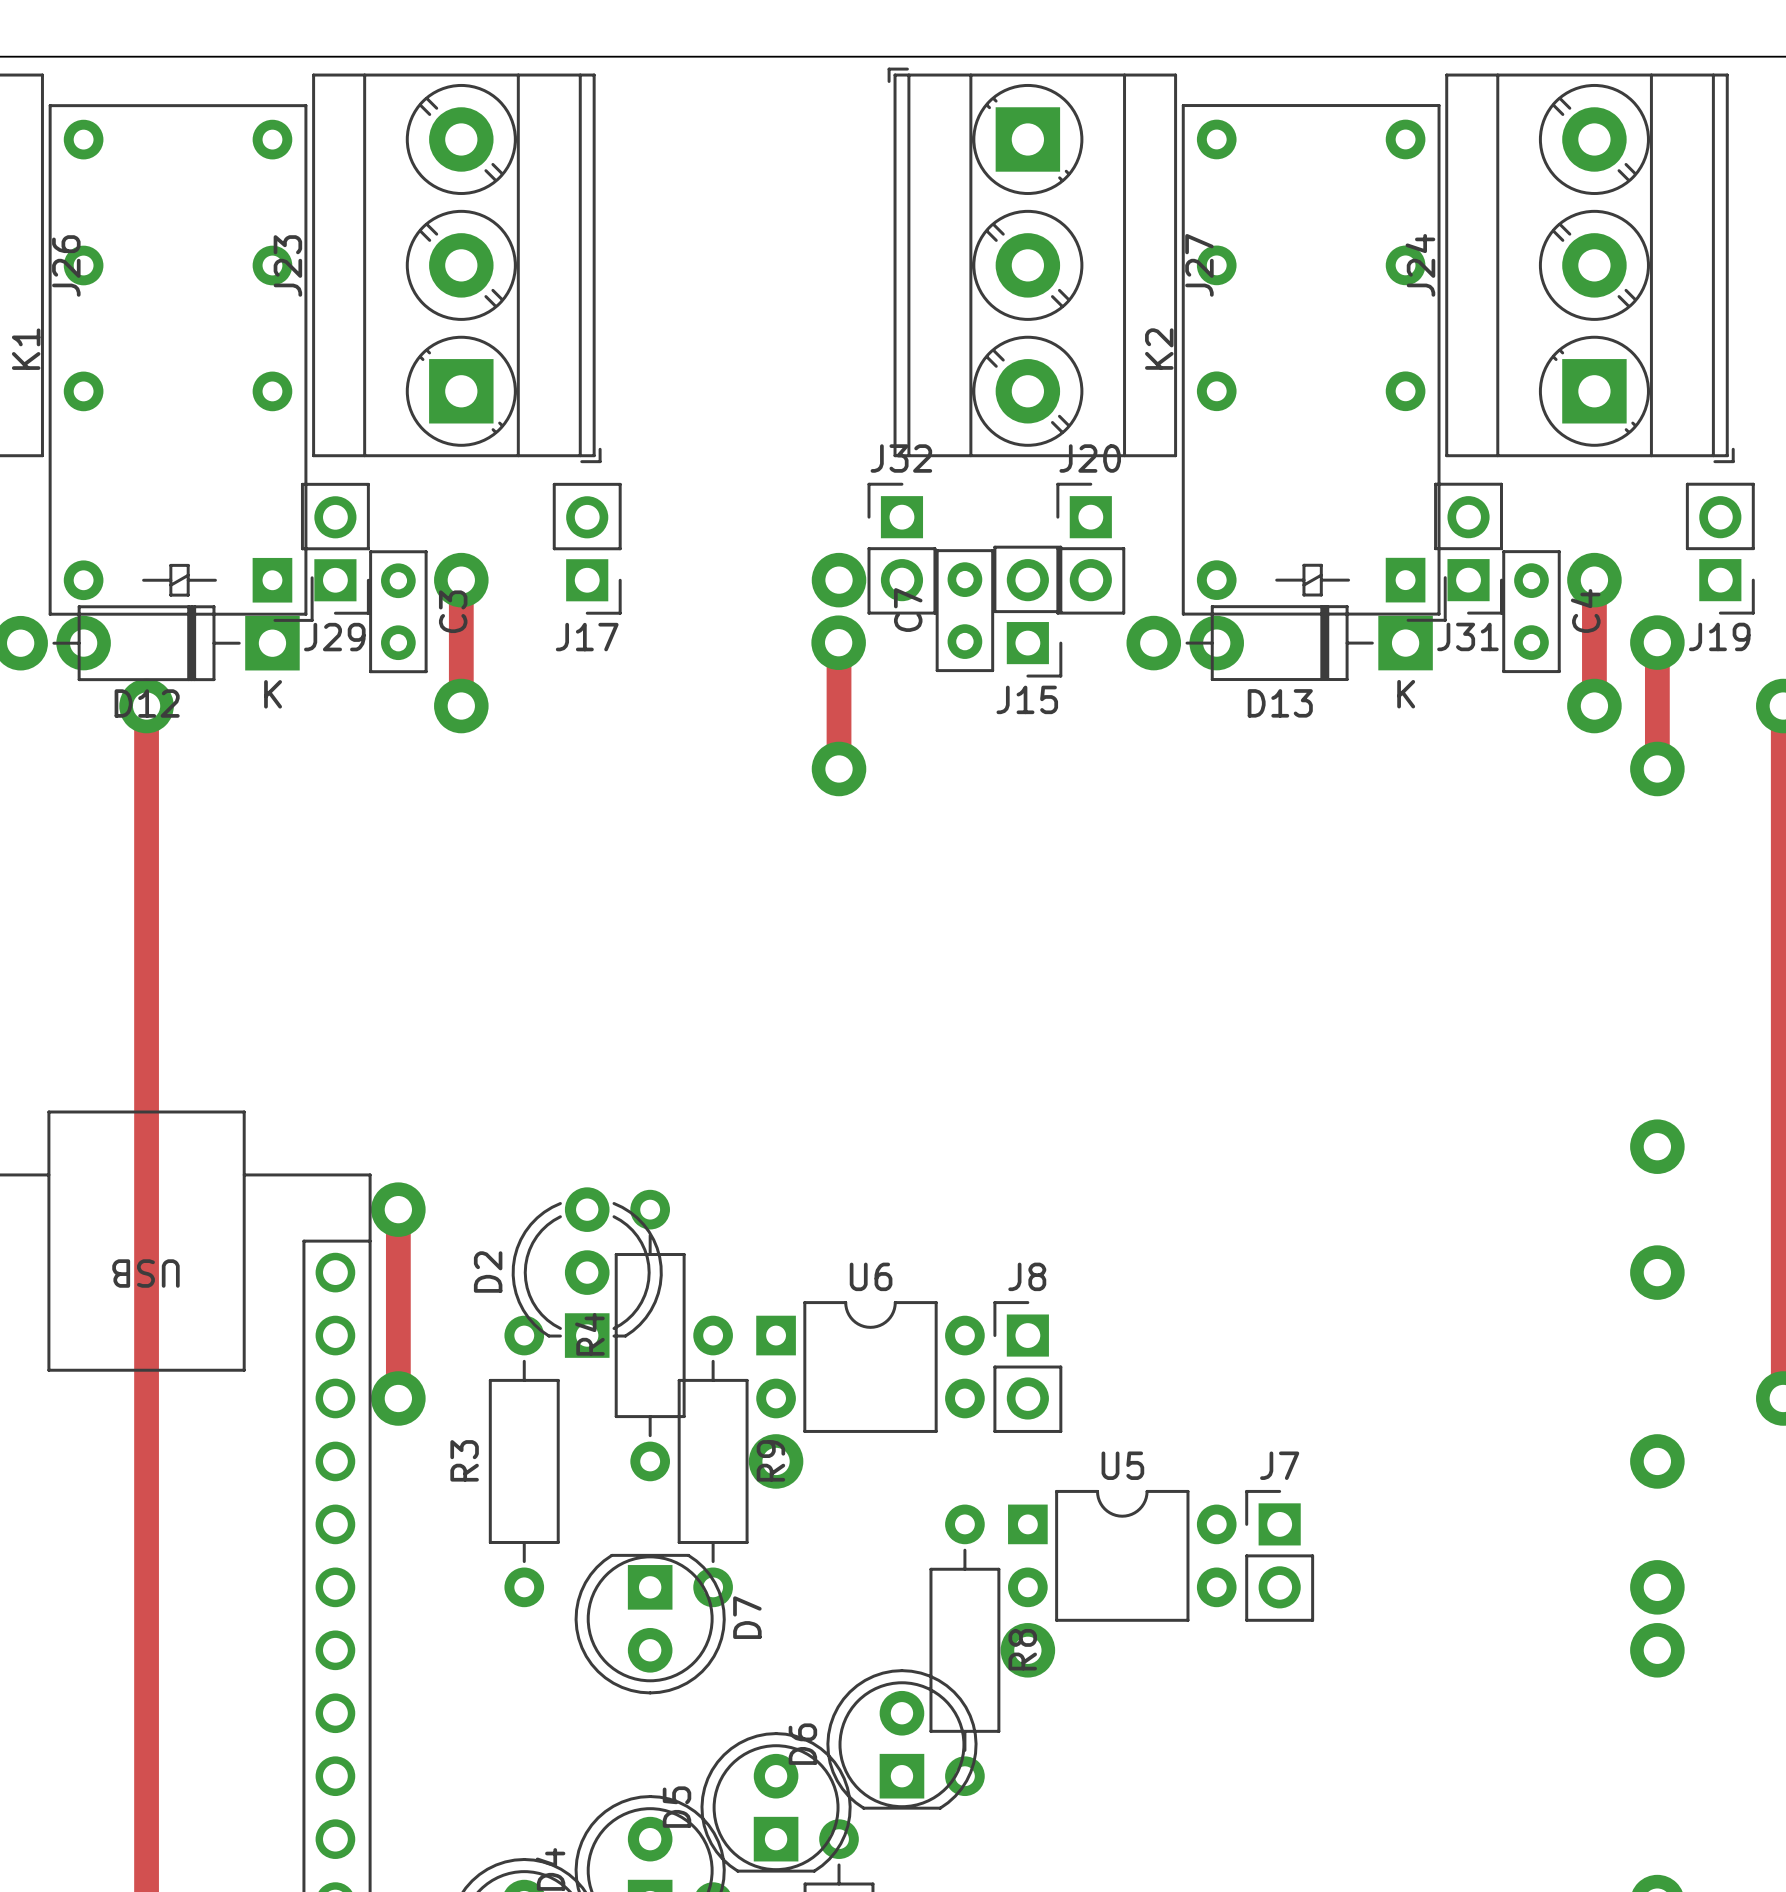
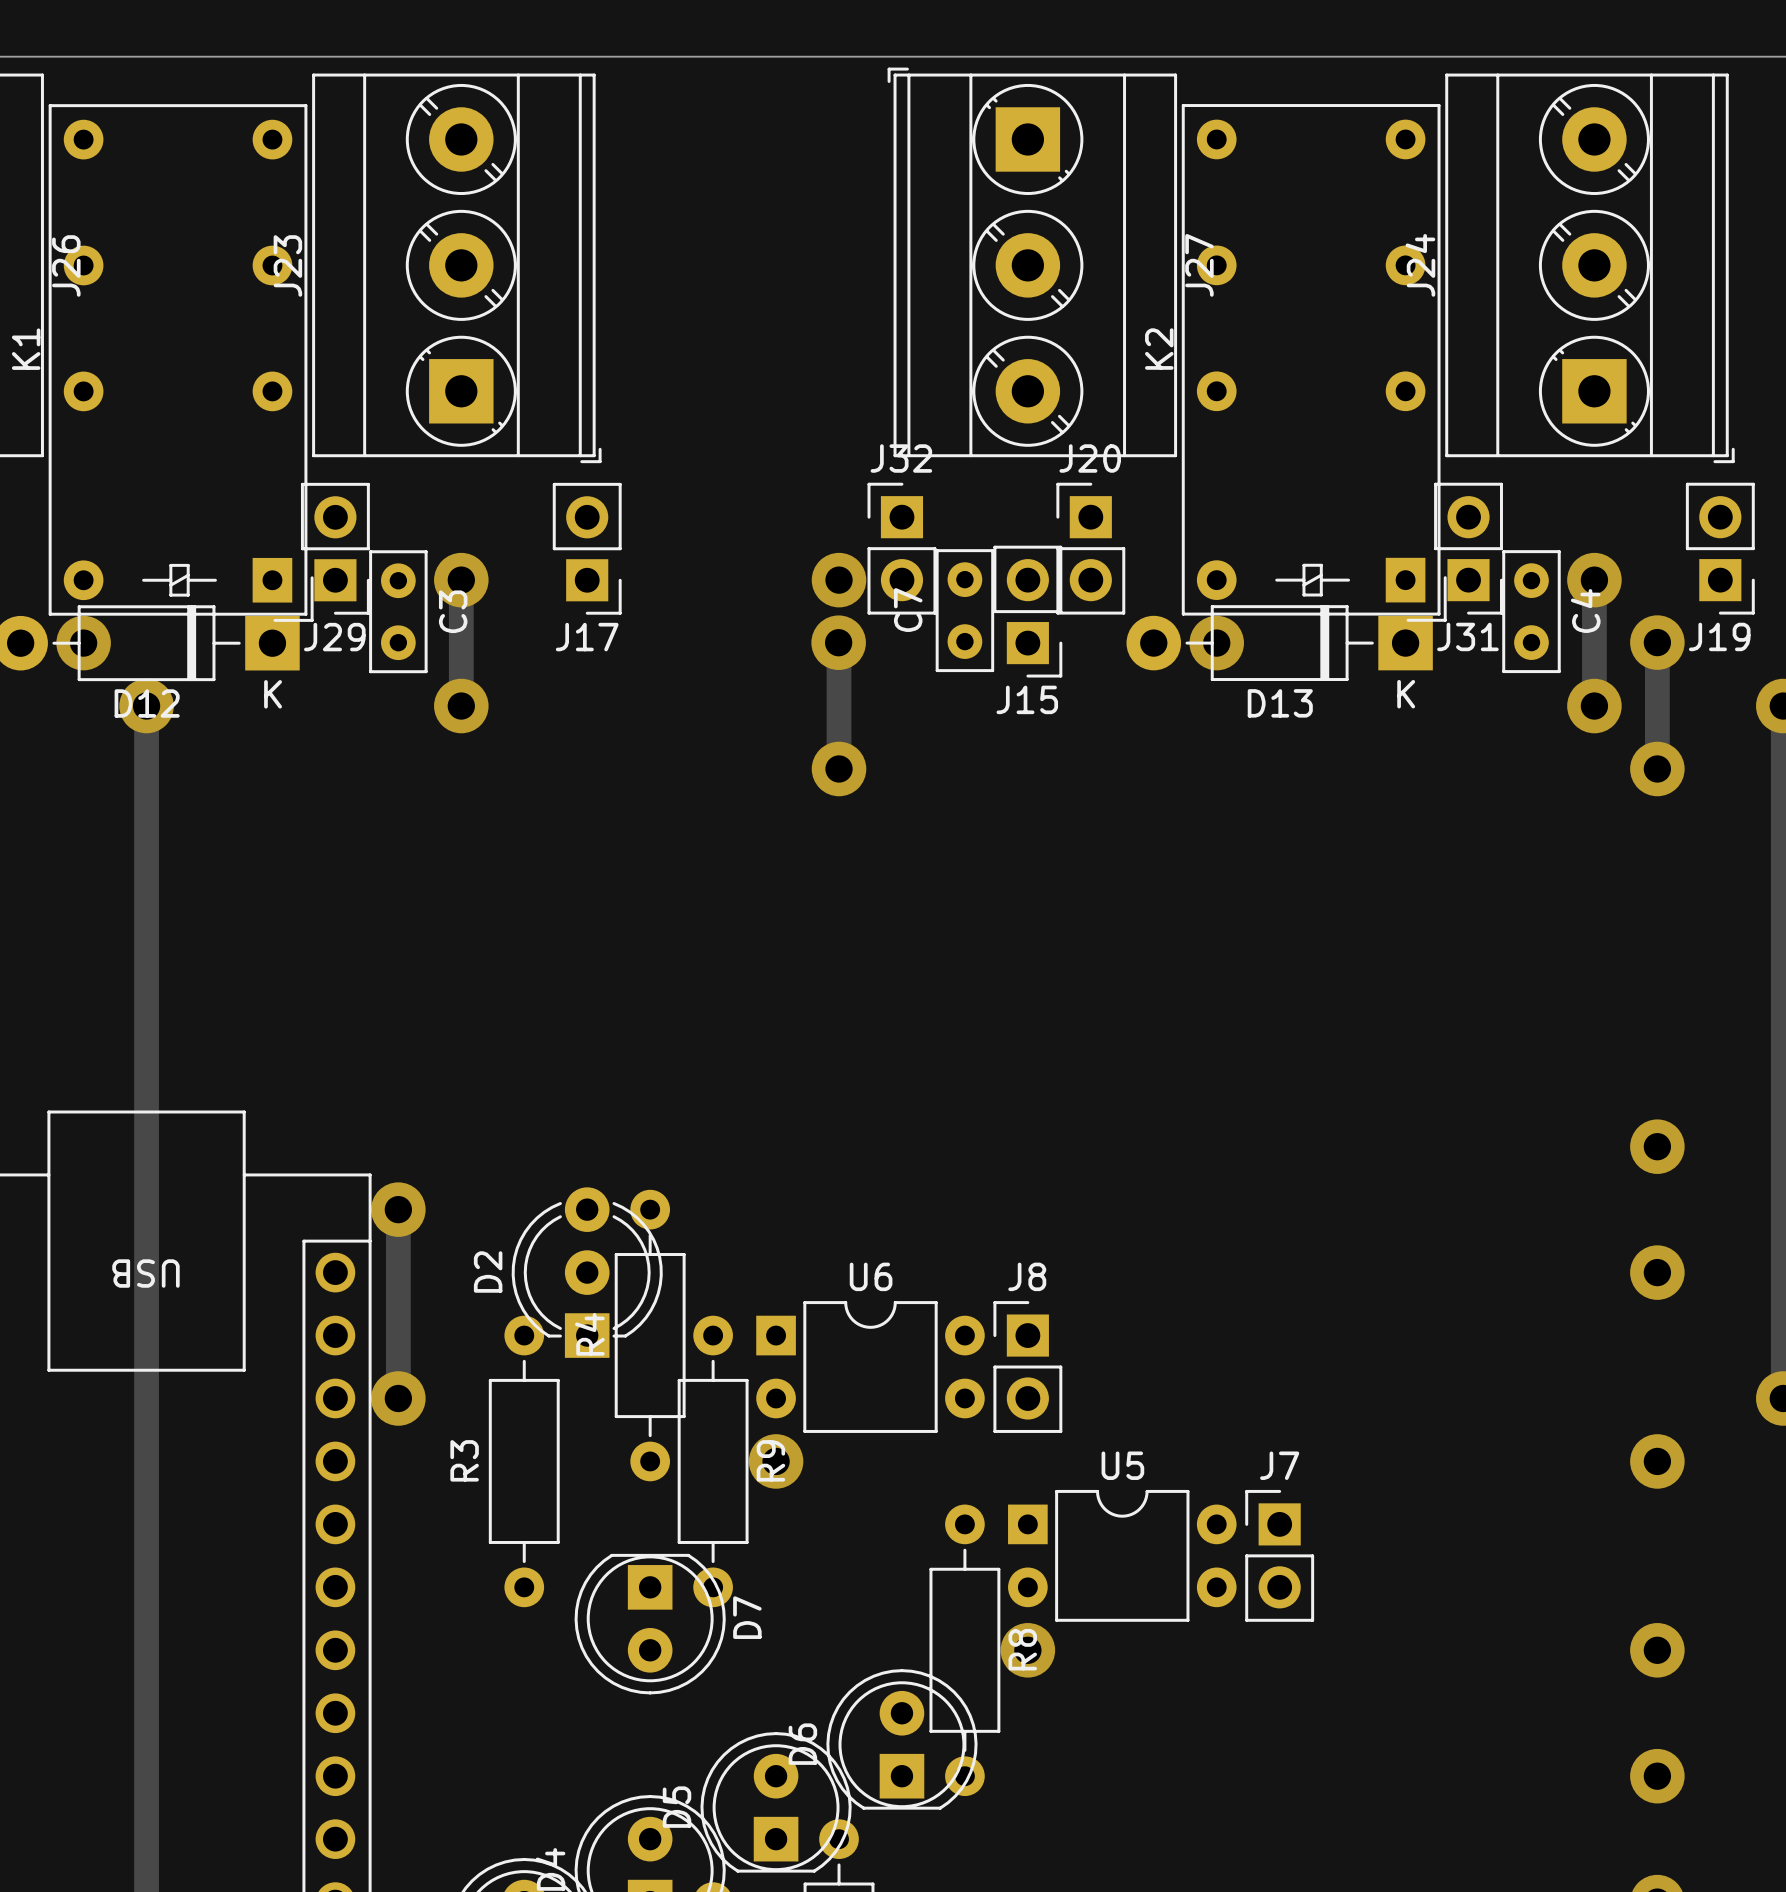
via: (1657, 1587) -> none
via: none -> (1657, 1776)

